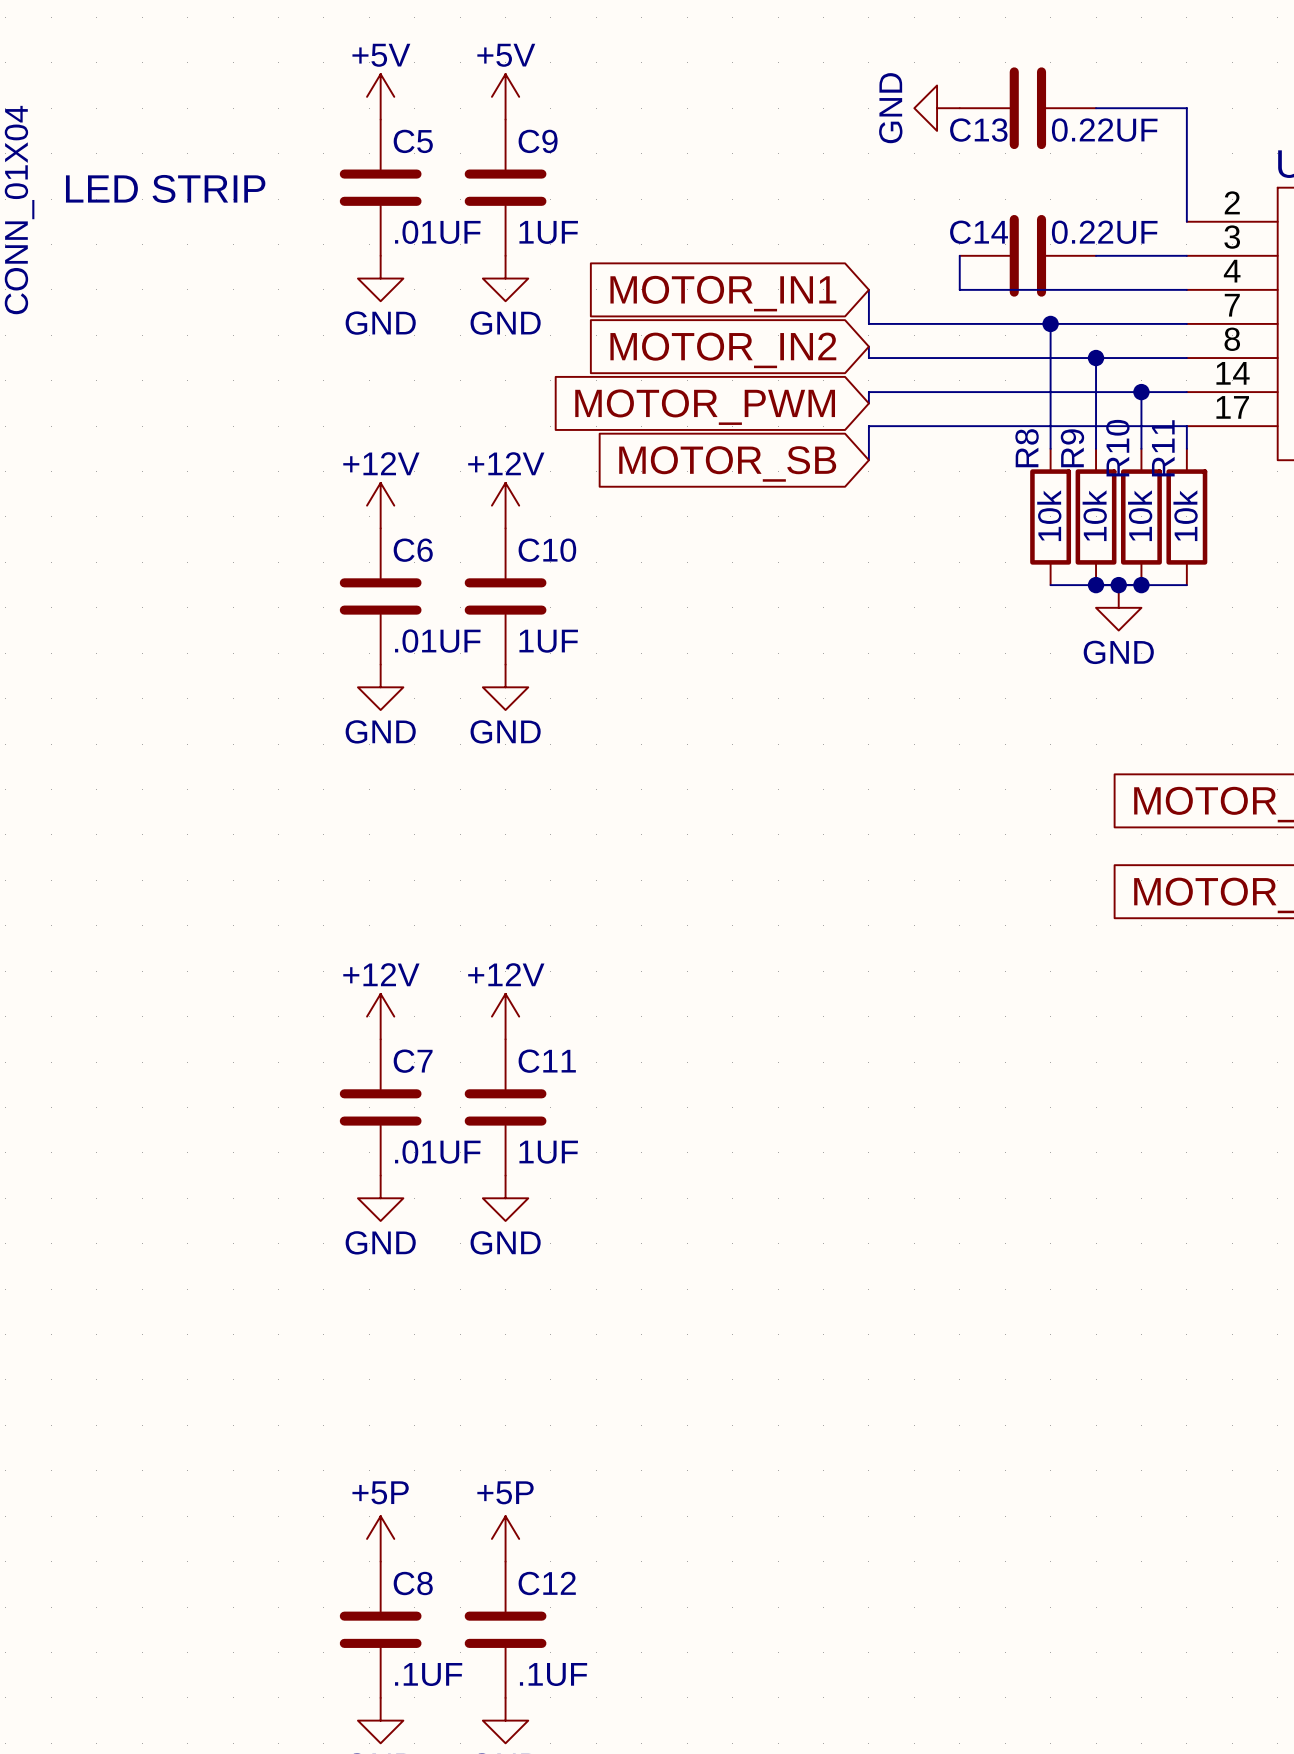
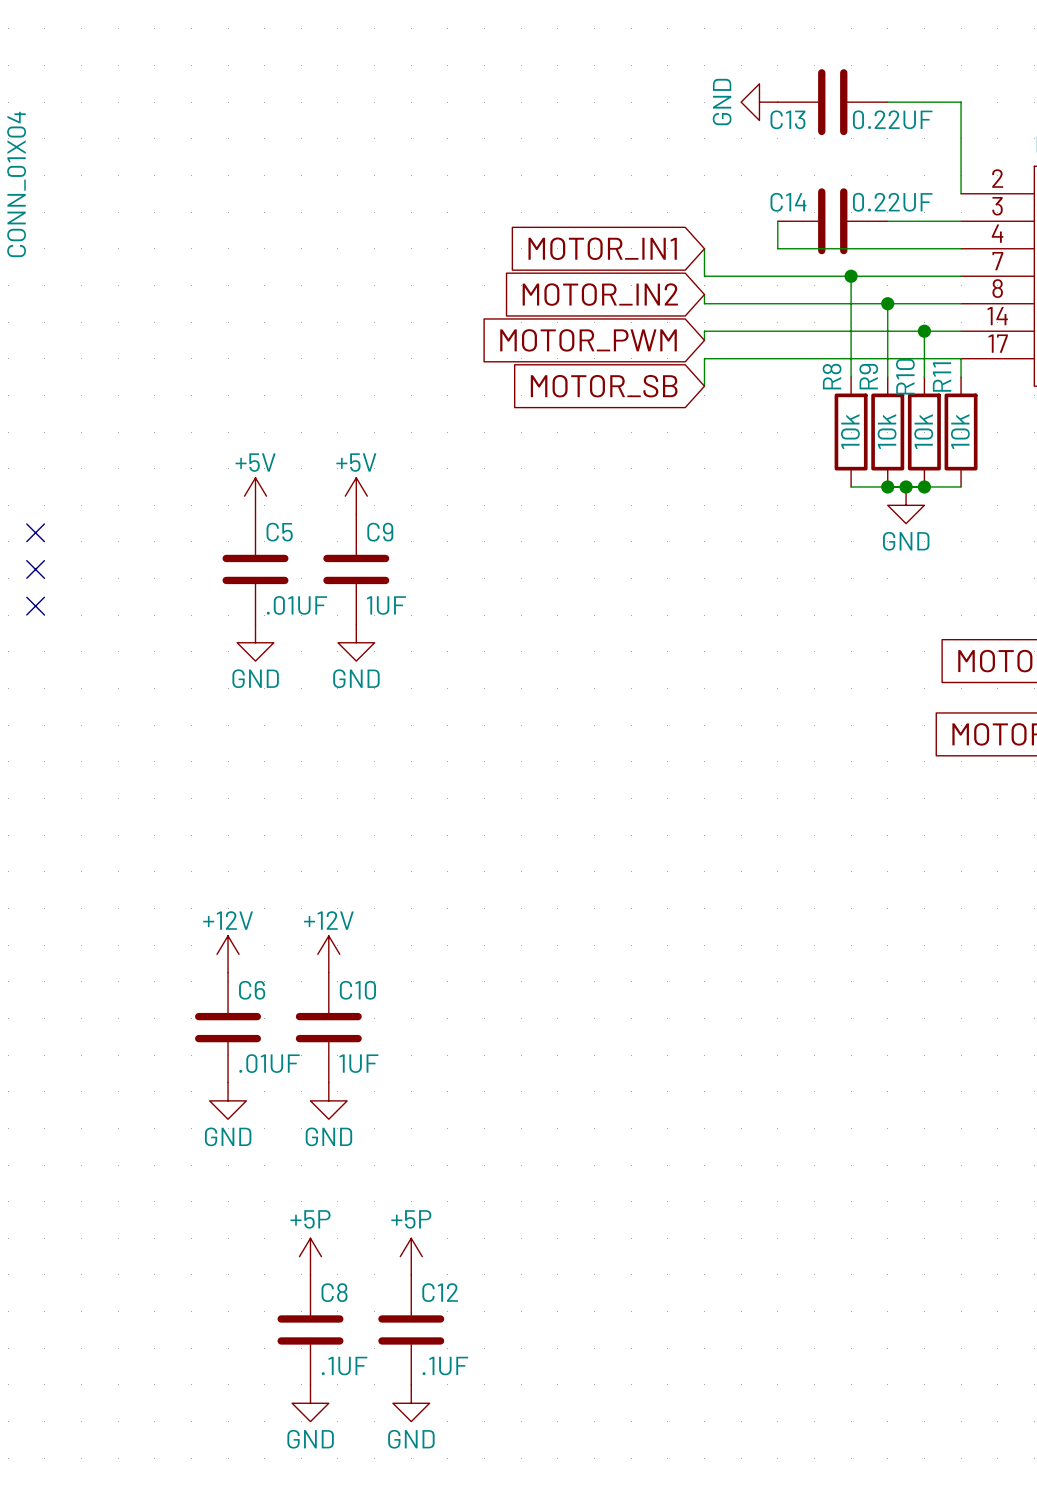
power symbol: +5V (380, 96) -> none
power symbol: +5V (505, 96) -> none
C5 position: (380, 187) -> (255, 569)
C9 position: (505, 187) -> (356, 569)
text: LED STRIP (165, 188) -> none
power symbol: GND (380, 278) -> none
power symbol: GND (505, 278) -> none
power symbol: +12V (380, 505) -> none
power symbol: +12V (505, 505) -> none
power symbol: none -> +5V (255, 496)
C6 position: (380, 596) -> (228, 1027)
power symbol: none -> +5V (356, 496)
C10 position: (505, 596) -> (328, 1027)
no-connect mark: none -> (35, 532)
no-connect mark: none -> (35, 569)
power symbol: GND (380, 687) -> none
power symbol: GND (505, 687) -> none
no-connect mark: none -> (35, 606)
power symbol: none -> GND (255, 642)
power symbol: none -> GND (356, 642)
power symbol: +12V (380, 1016) -> none
power symbol: +12V (505, 1016) -> none
C7: .01UF (380, 1107) -> none
C11: 1UF (505, 1107) -> none
power symbol: none -> +12V (228, 954)
power symbol: none -> +12V (328, 954)
power symbol: GND (380, 1198) -> none
power symbol: GND (505, 1198) -> none
power symbol: none -> GND (228, 1100)
power symbol: none -> GND (328, 1100)

